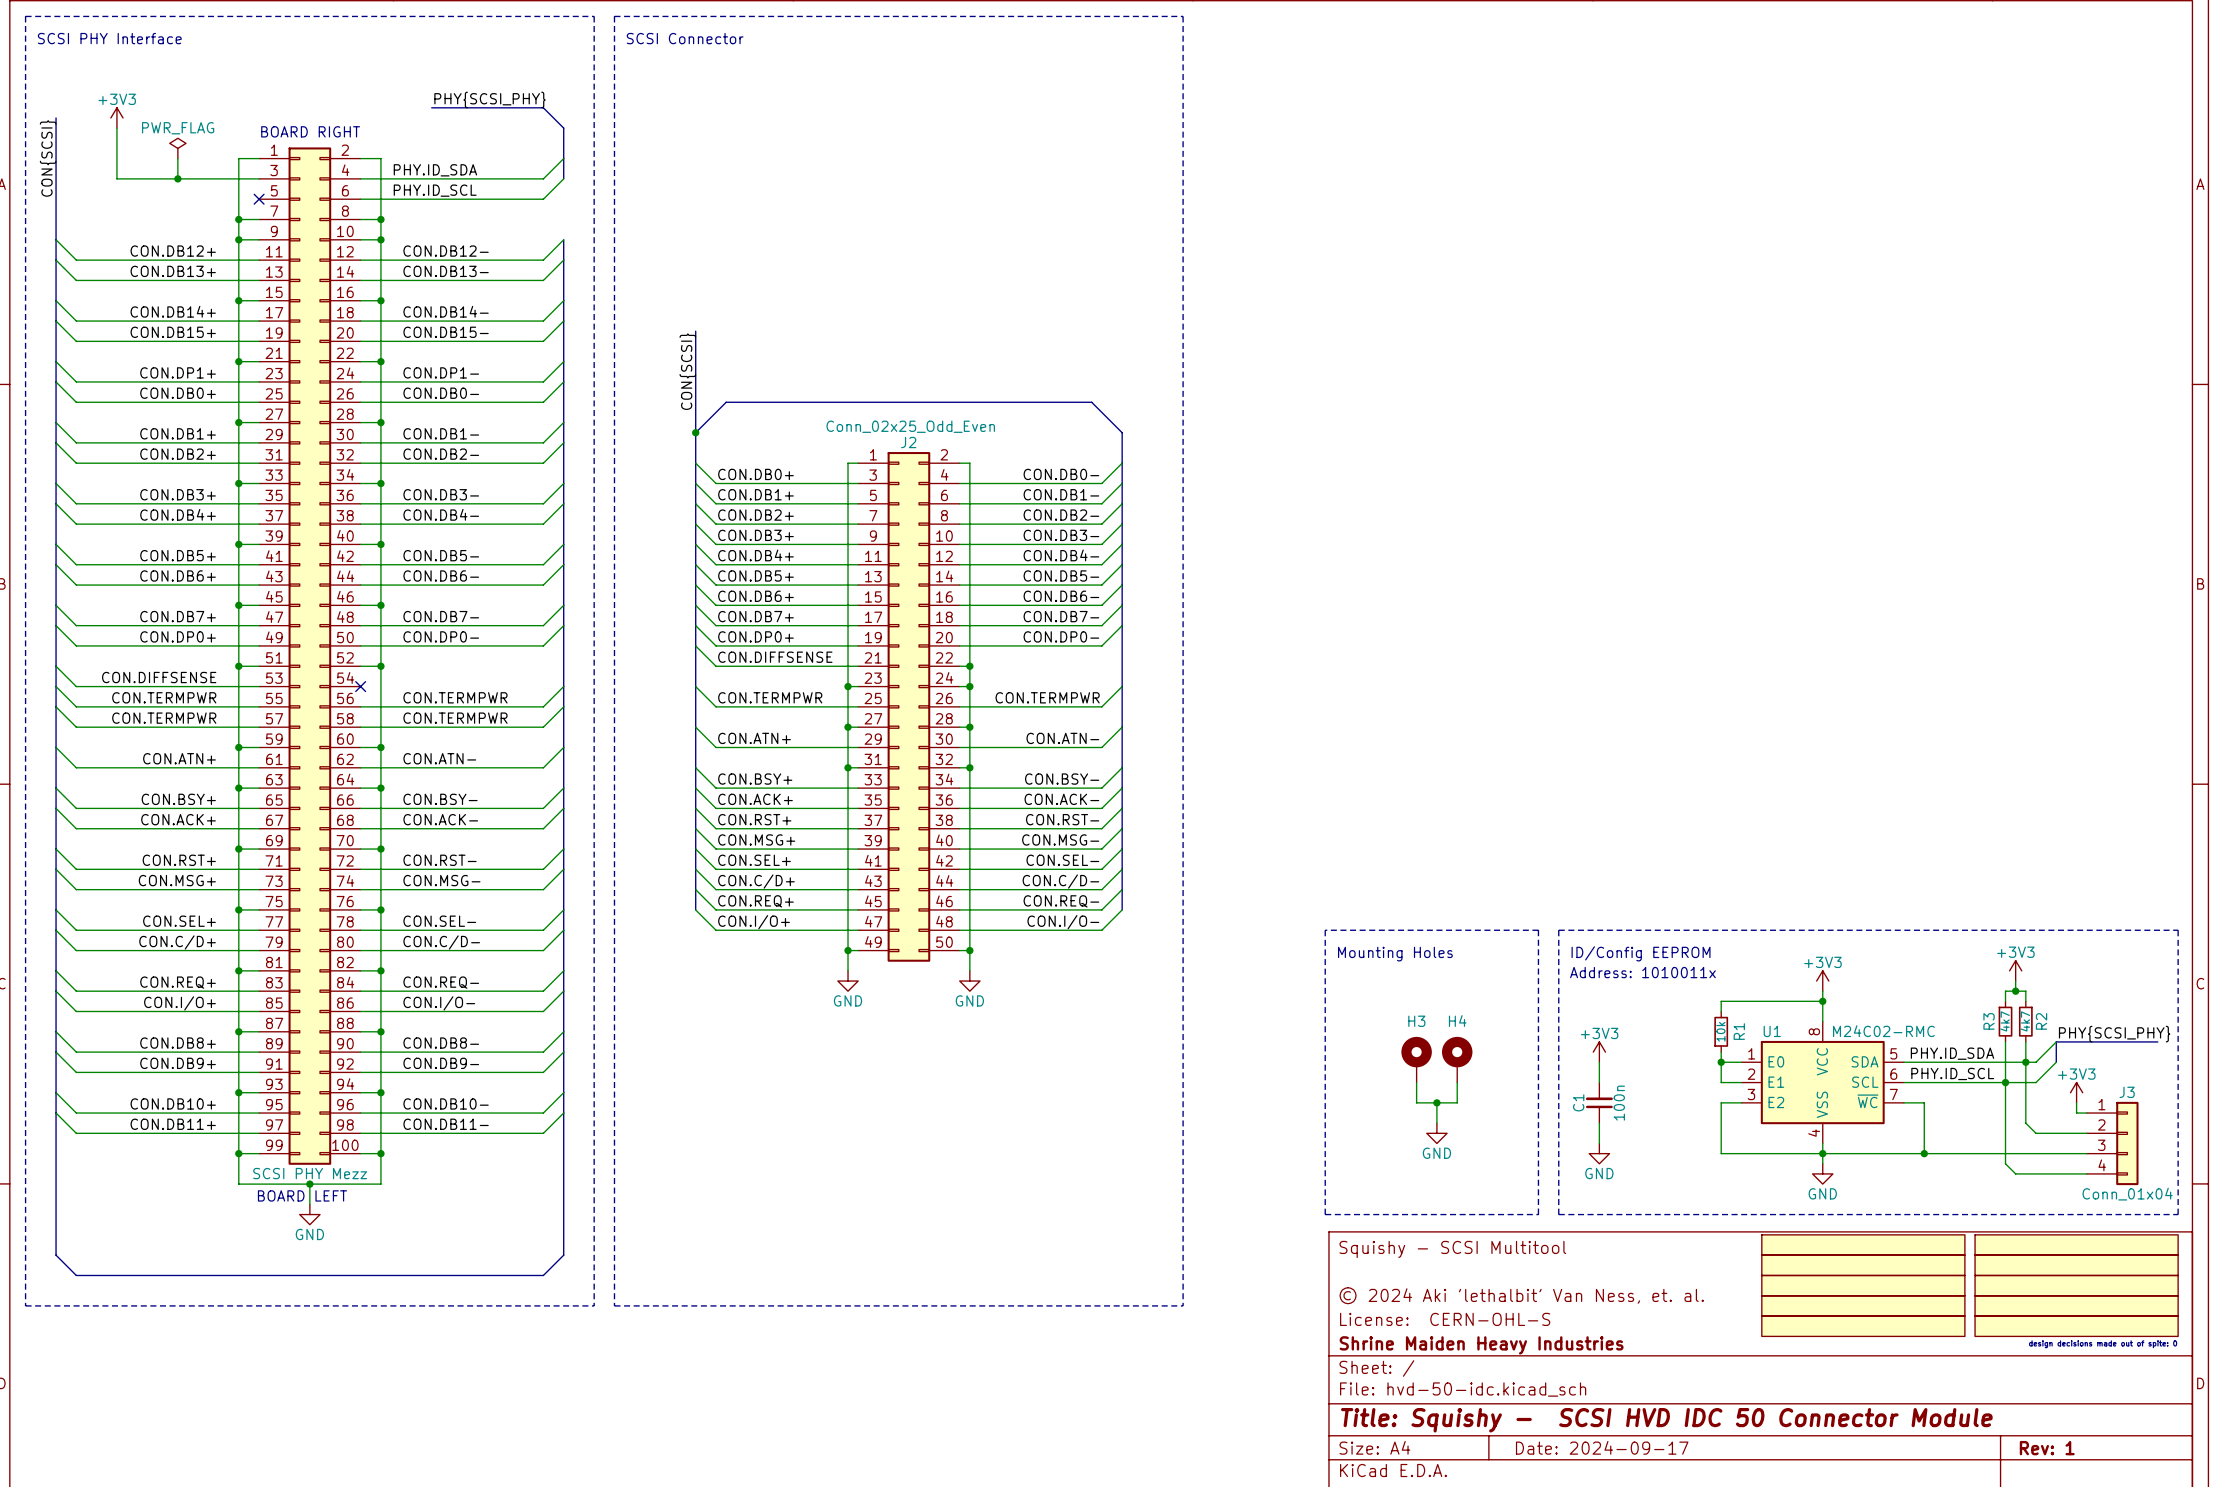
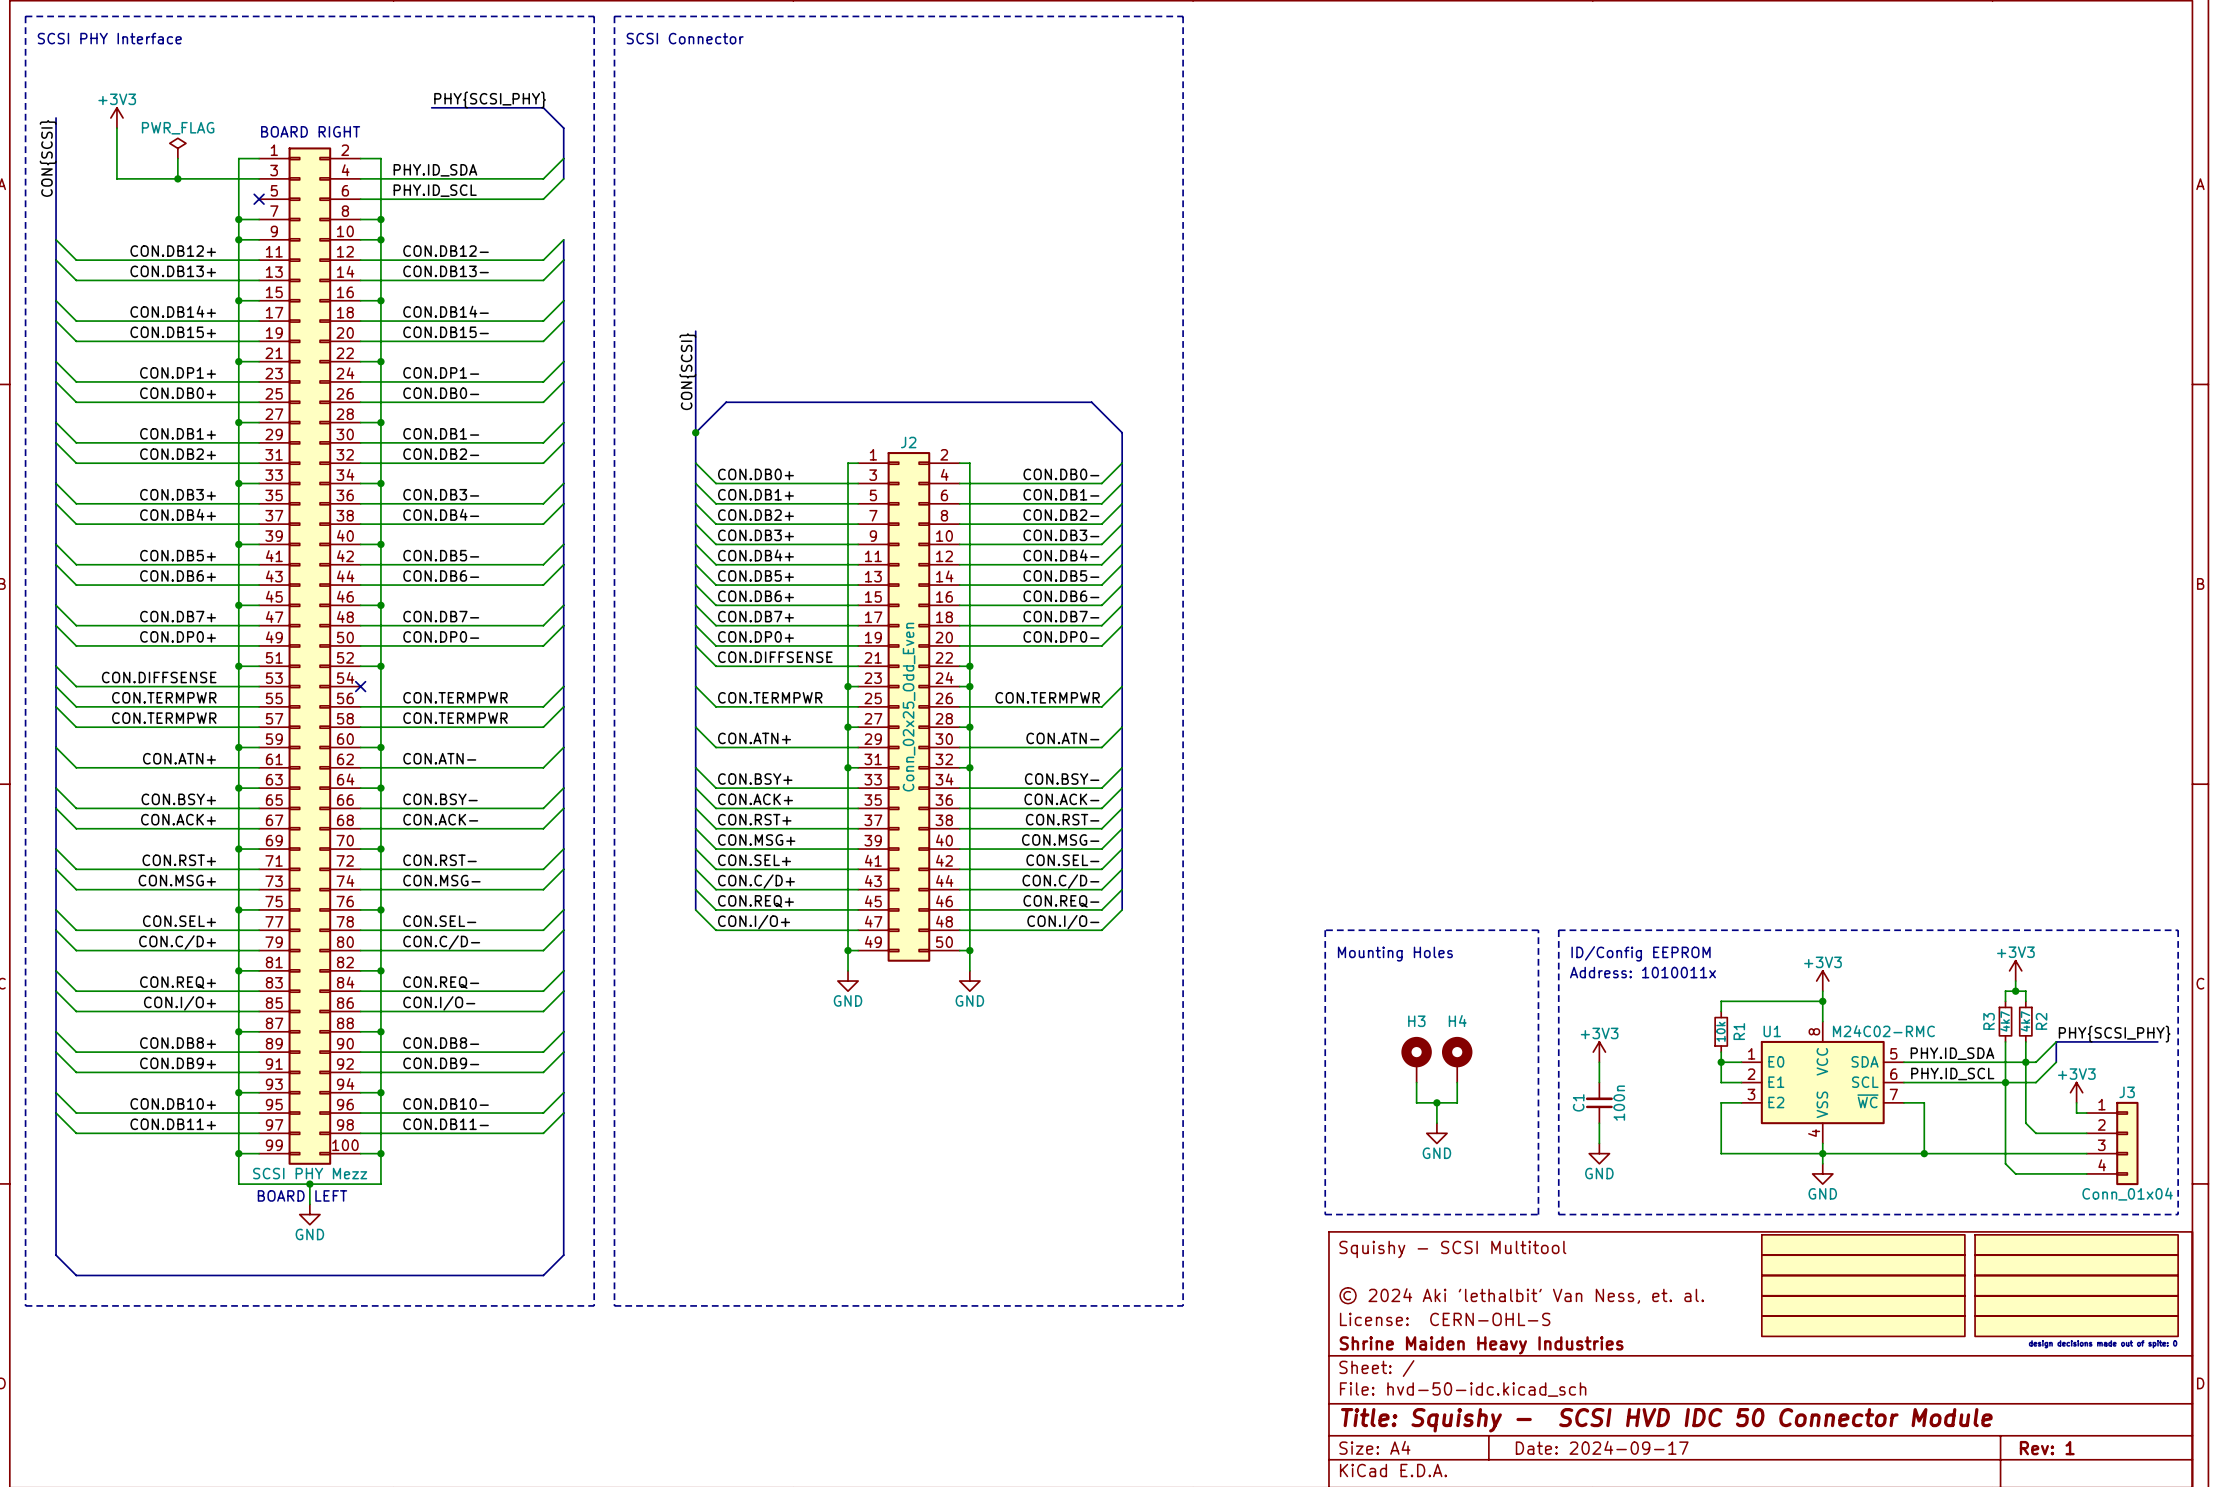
J2 value rotation: 0° (910, 426) -> 90° counterclockwise (909, 707)
J2 value position: Conn_02x25_Odd_Even (910, 426) -> Conn_02x25_Odd_Even (909, 707)

